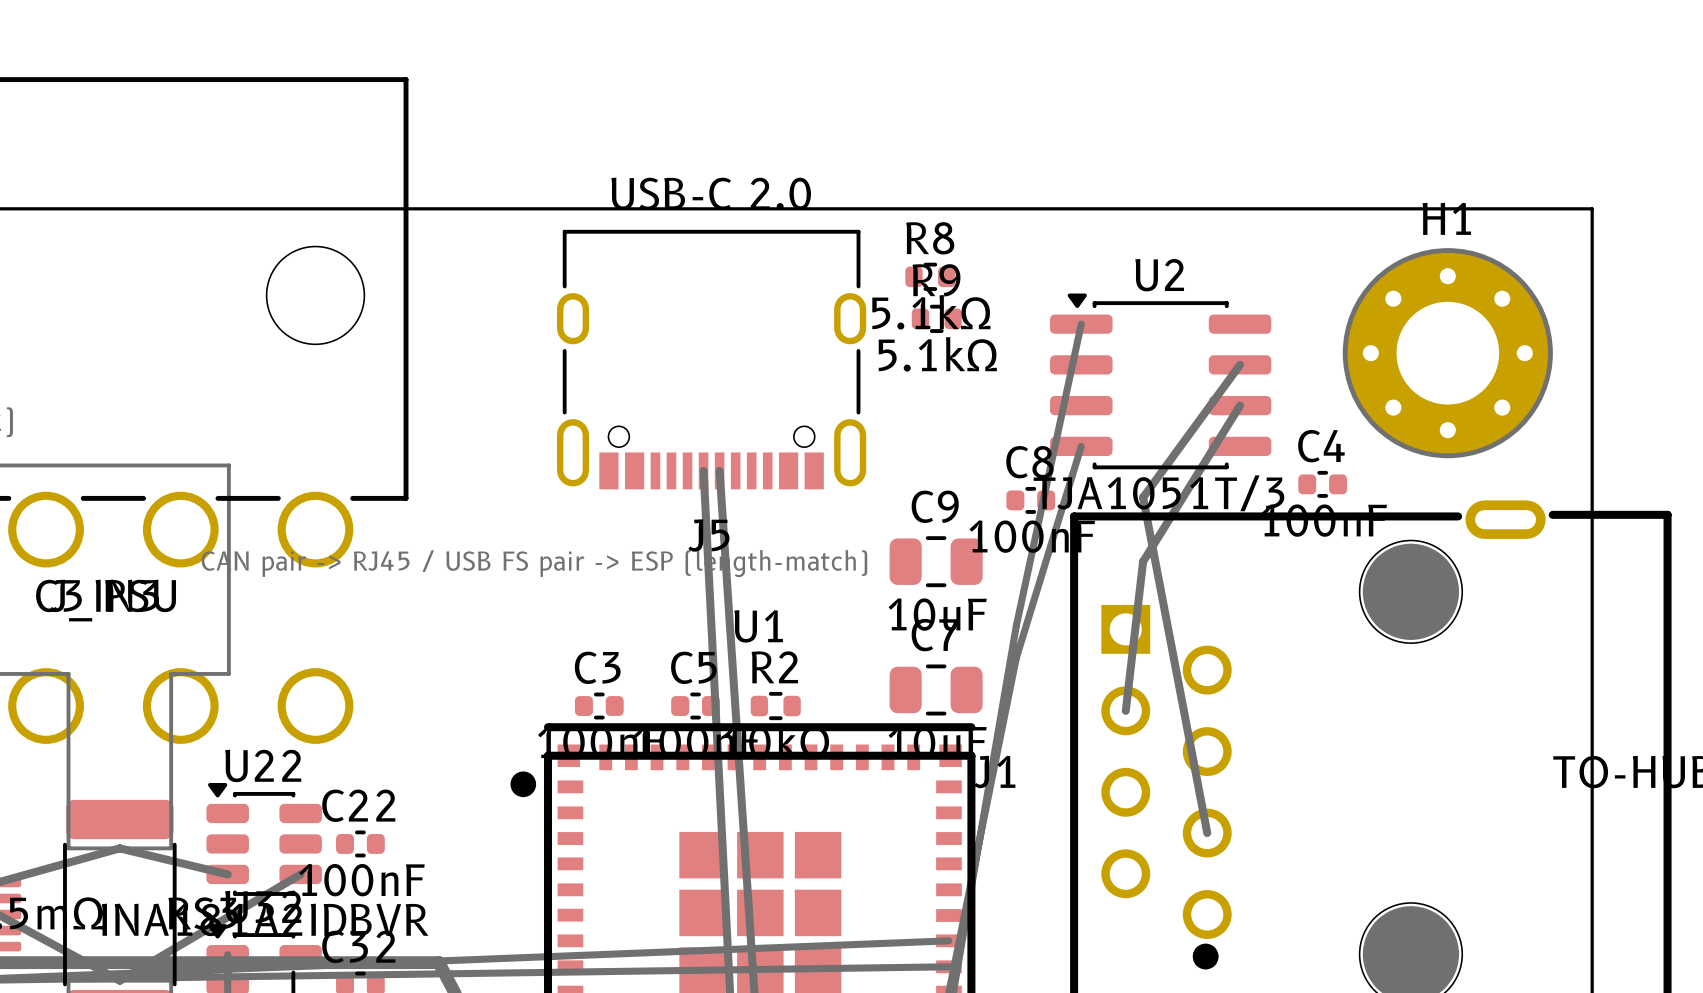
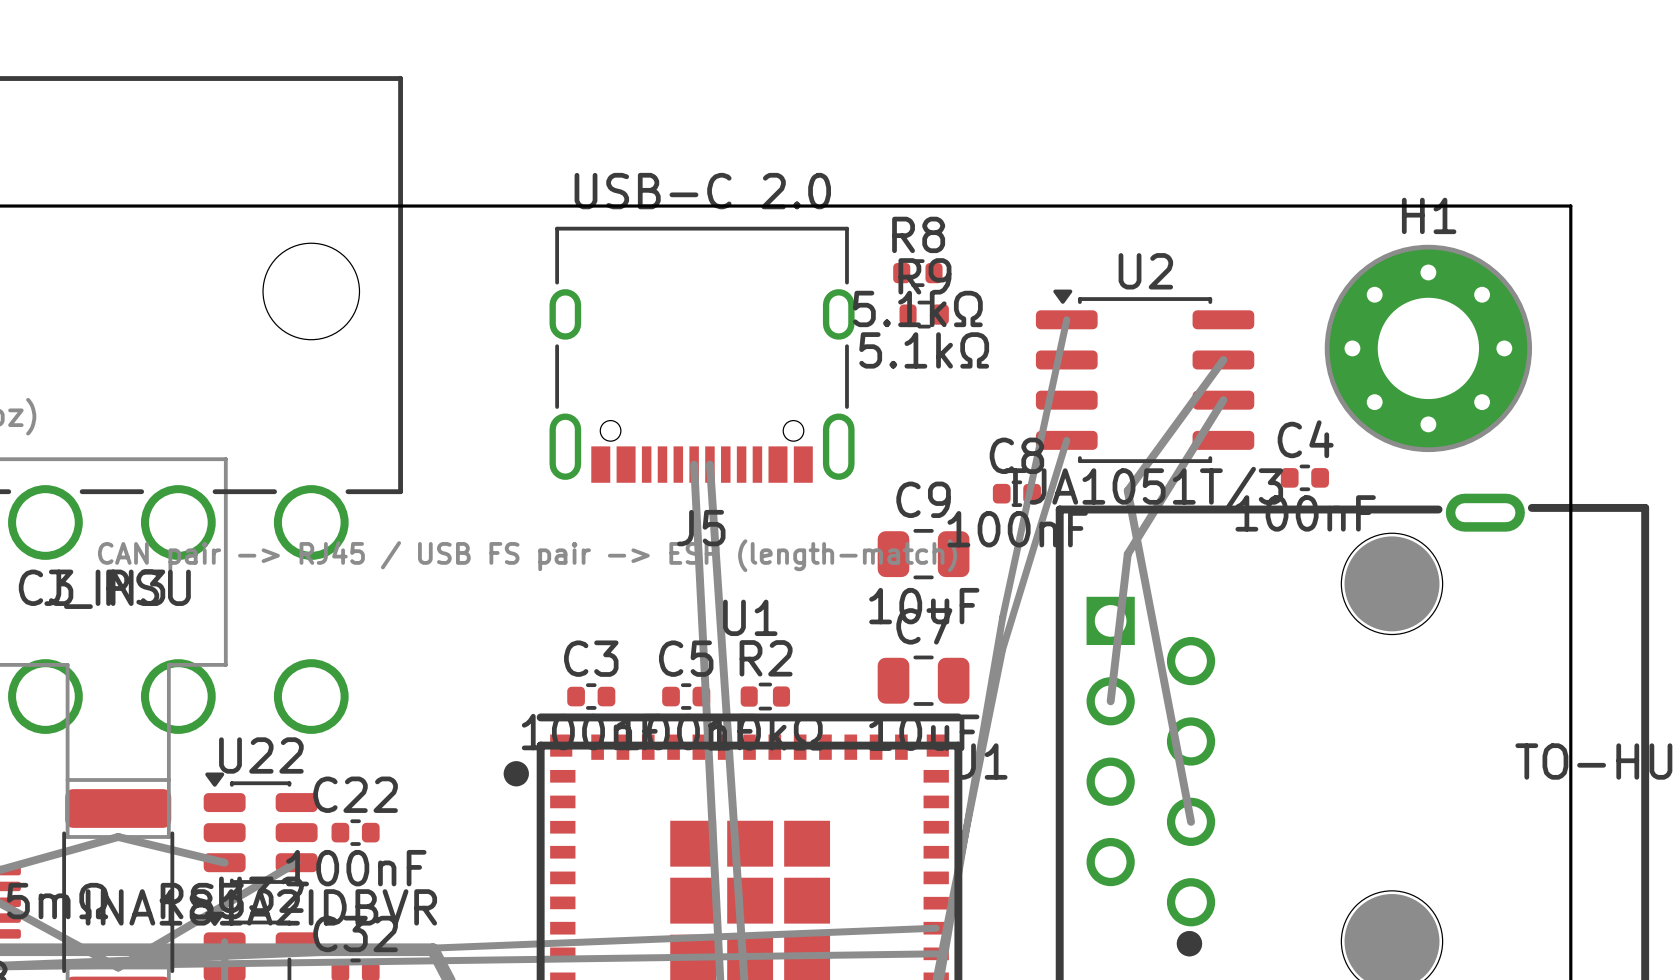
line: none -> (67, 780) (168, 780)

